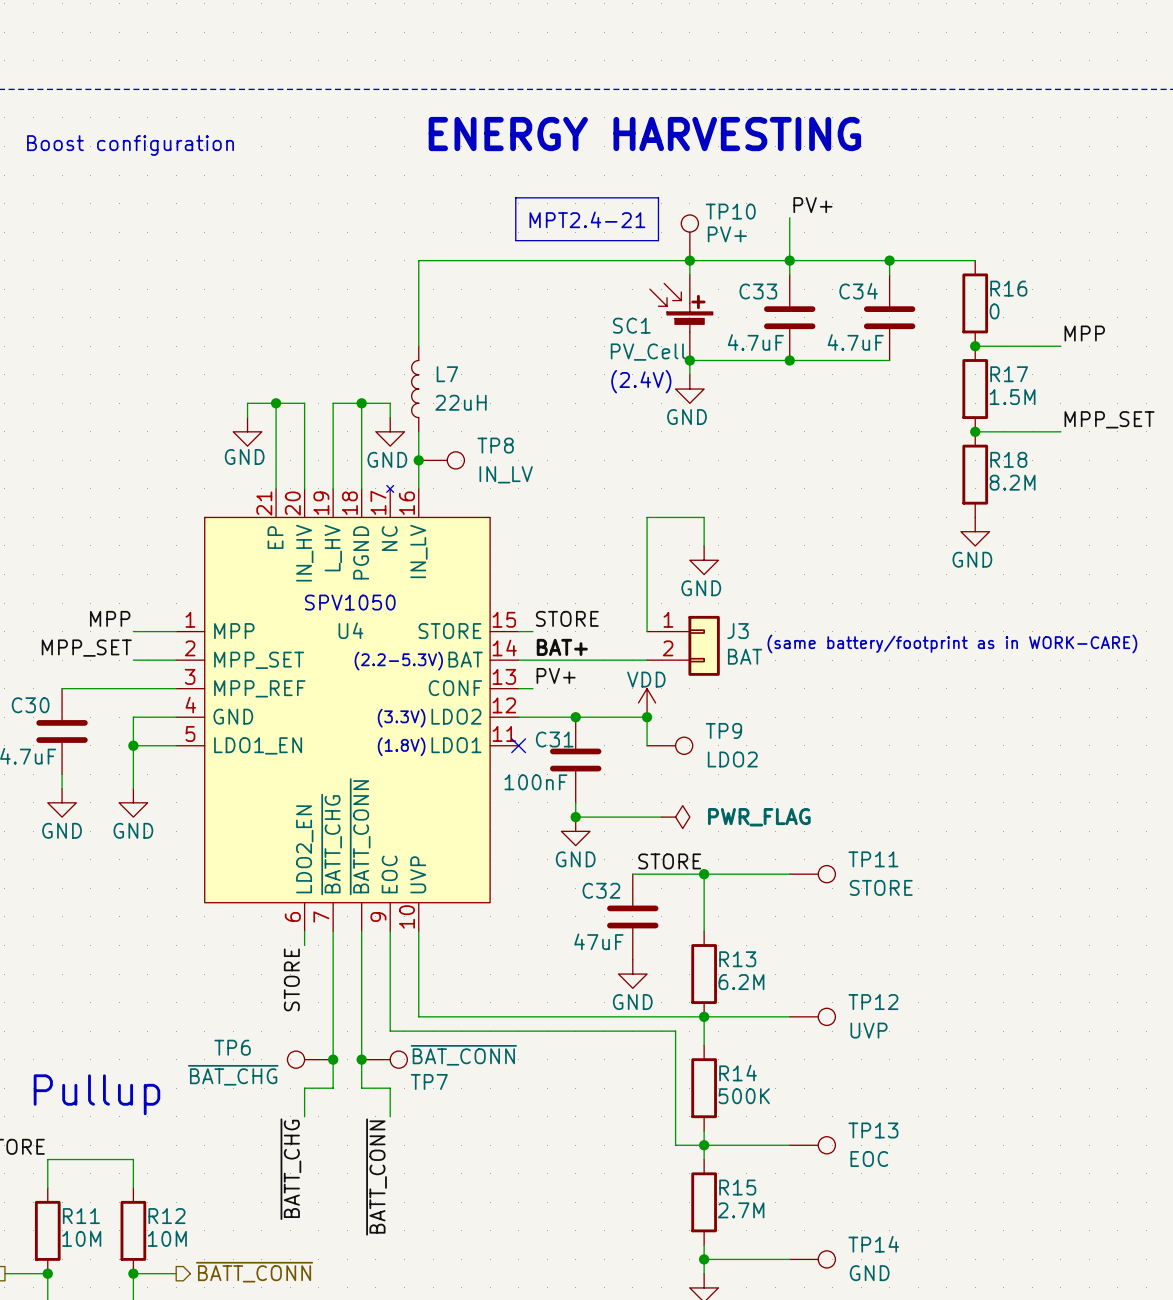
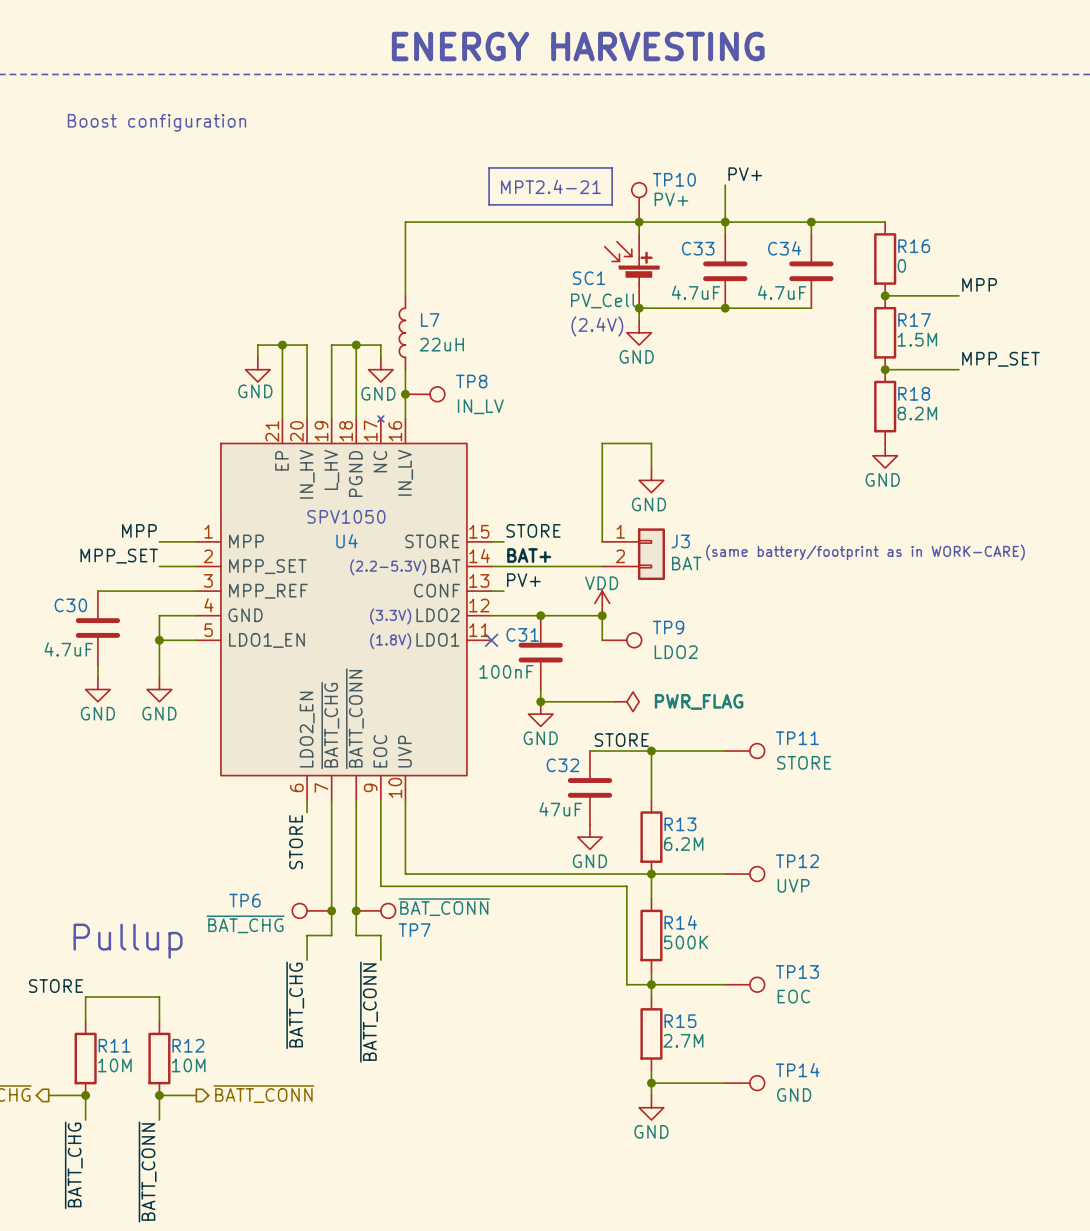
text position: ENERGY HARVESTING (644, 134) -> ENERGY HARVESTING (578, 46)

